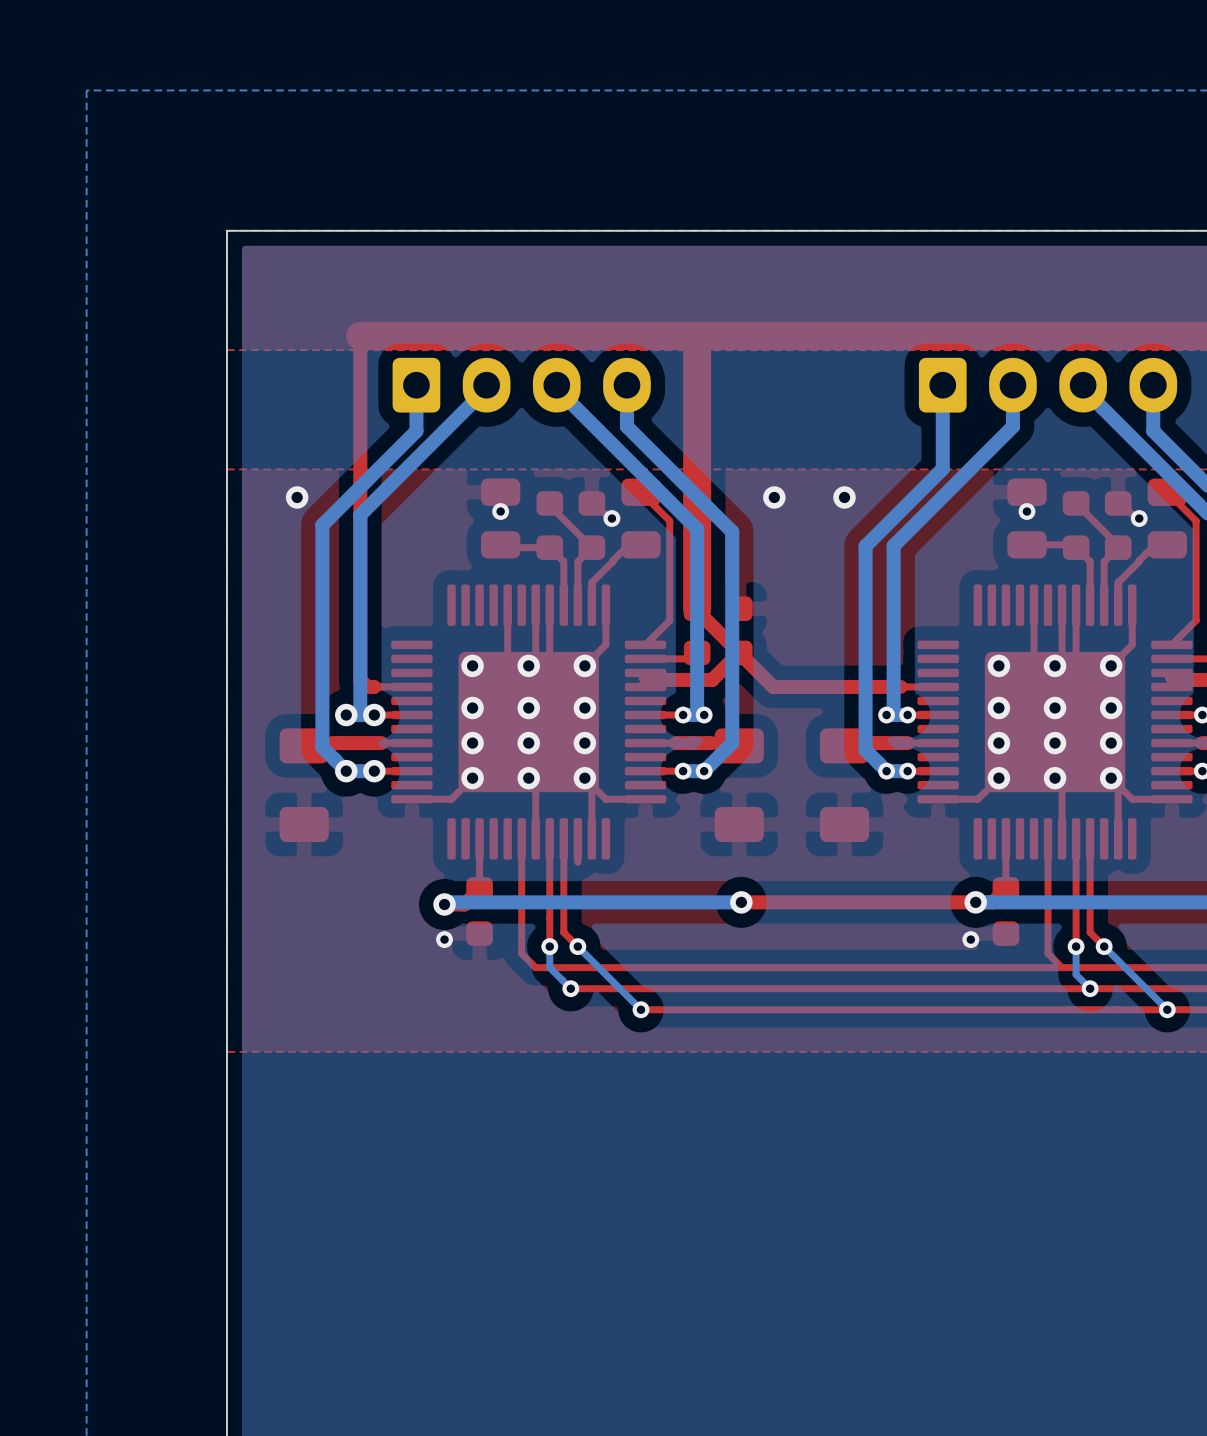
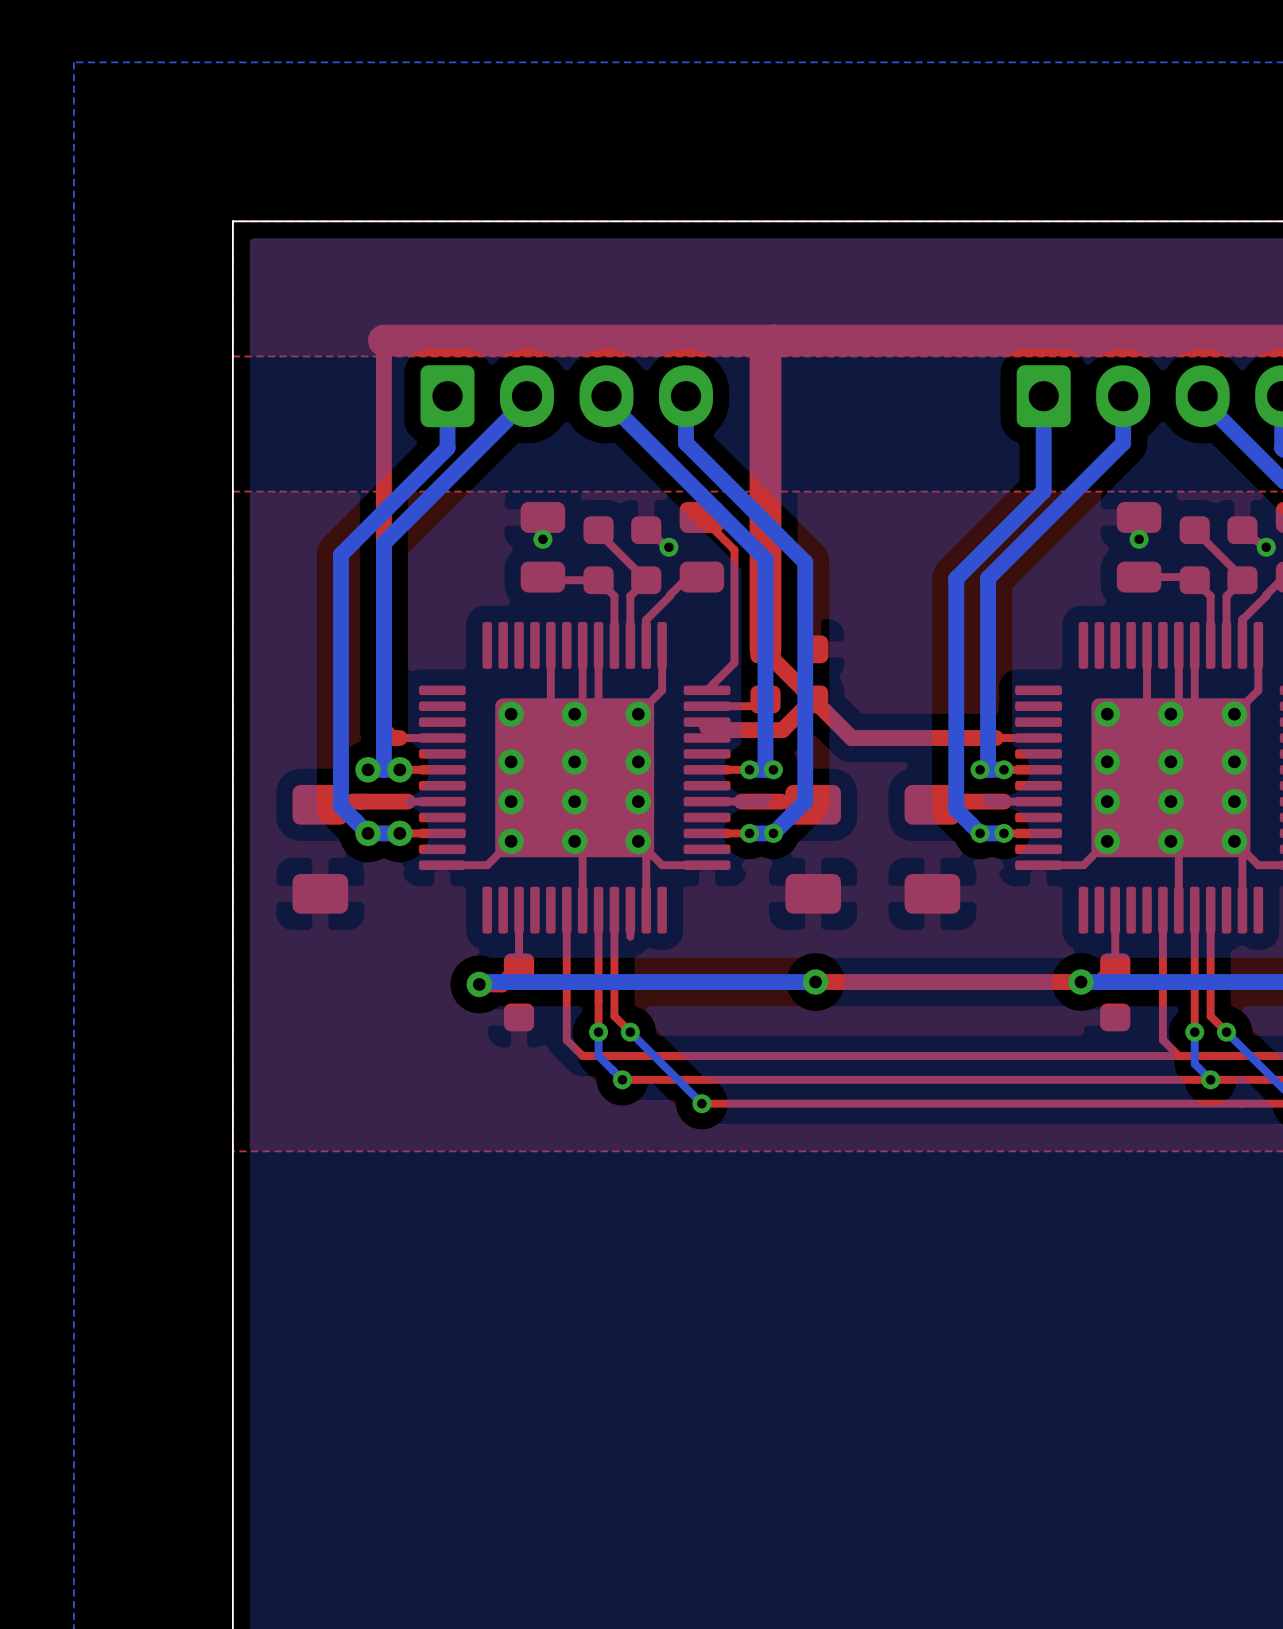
via: (297, 497) -> none
via: (774, 497) -> none
via: (844, 497) -> none
via: (444, 939) -> none
via: (970, 939) -> none

